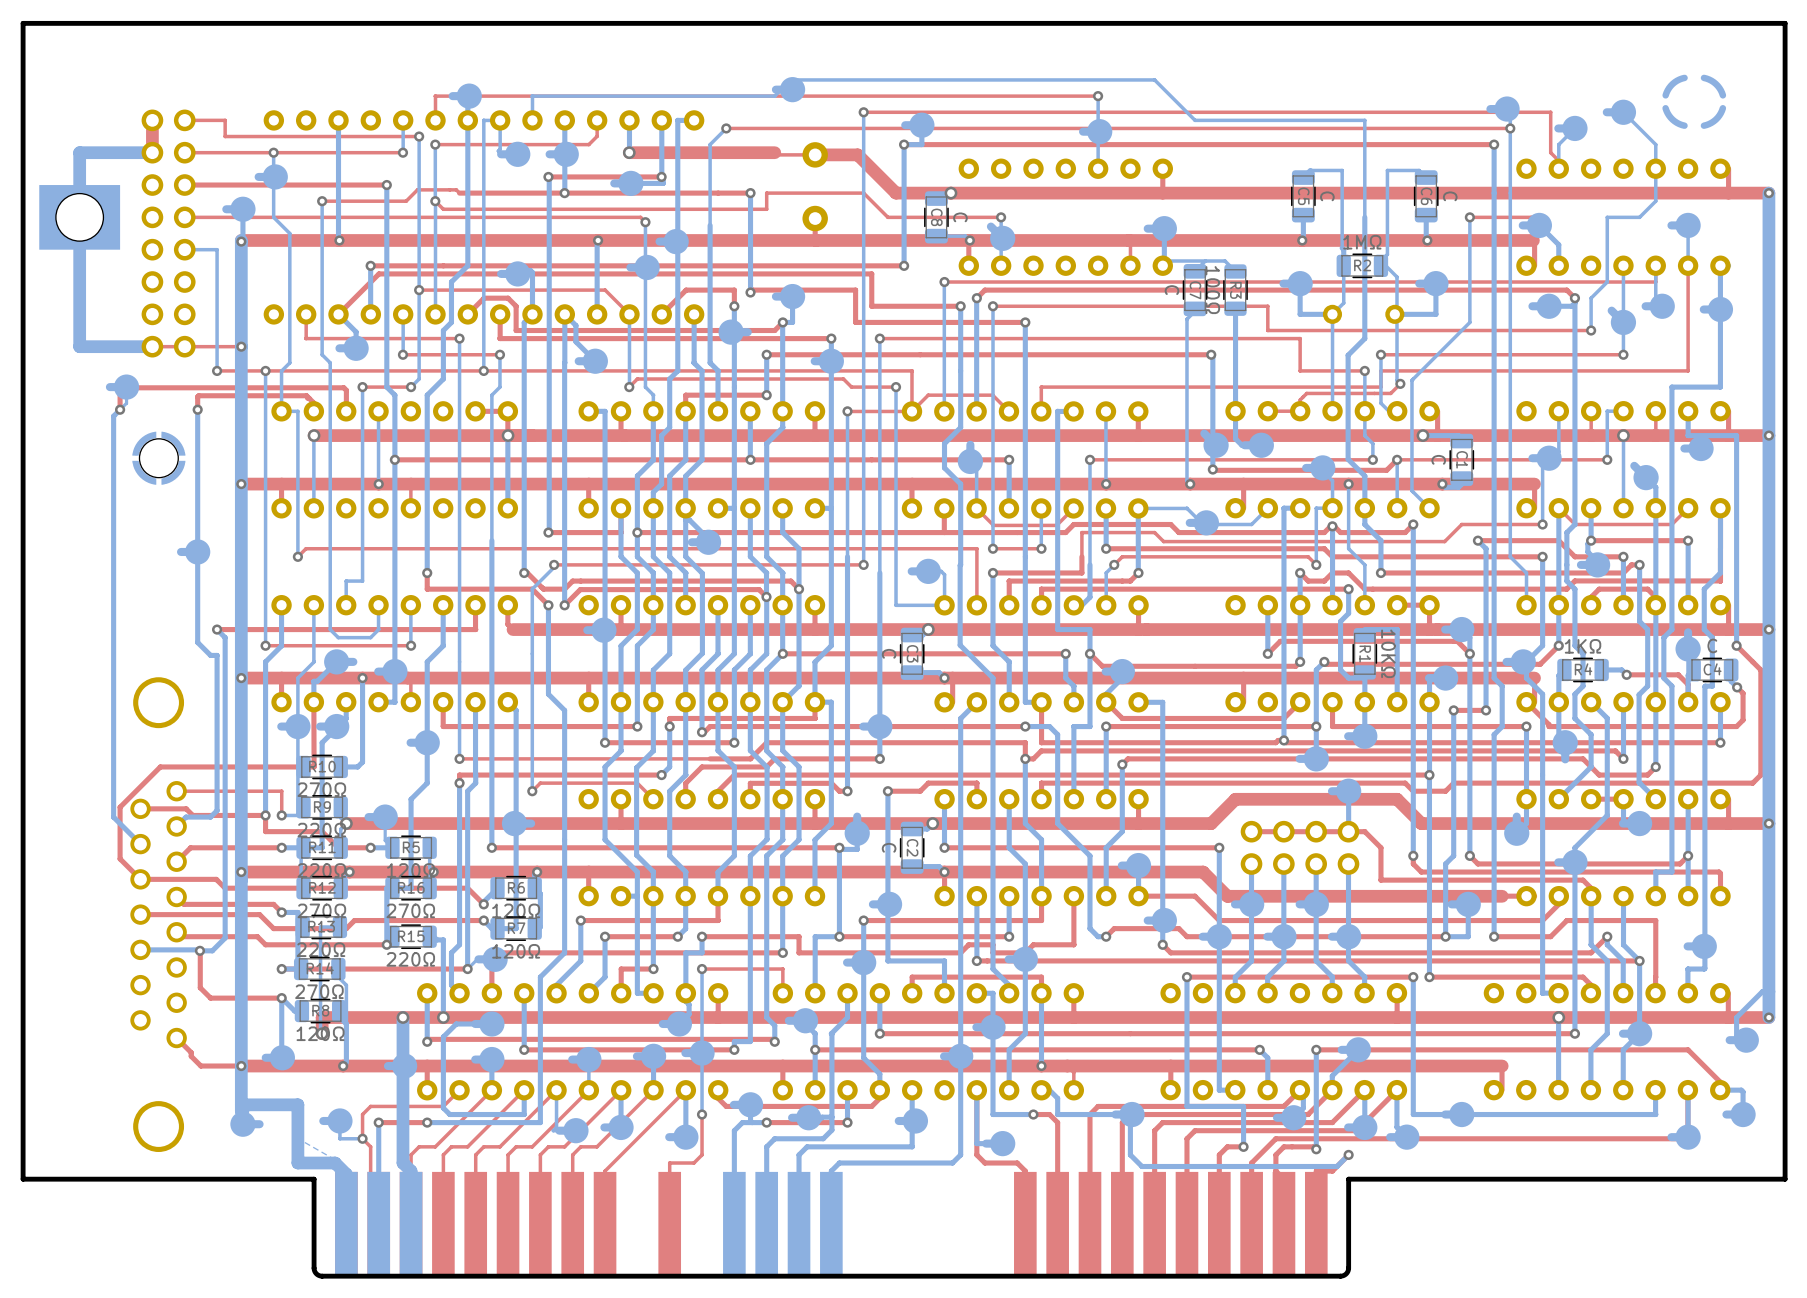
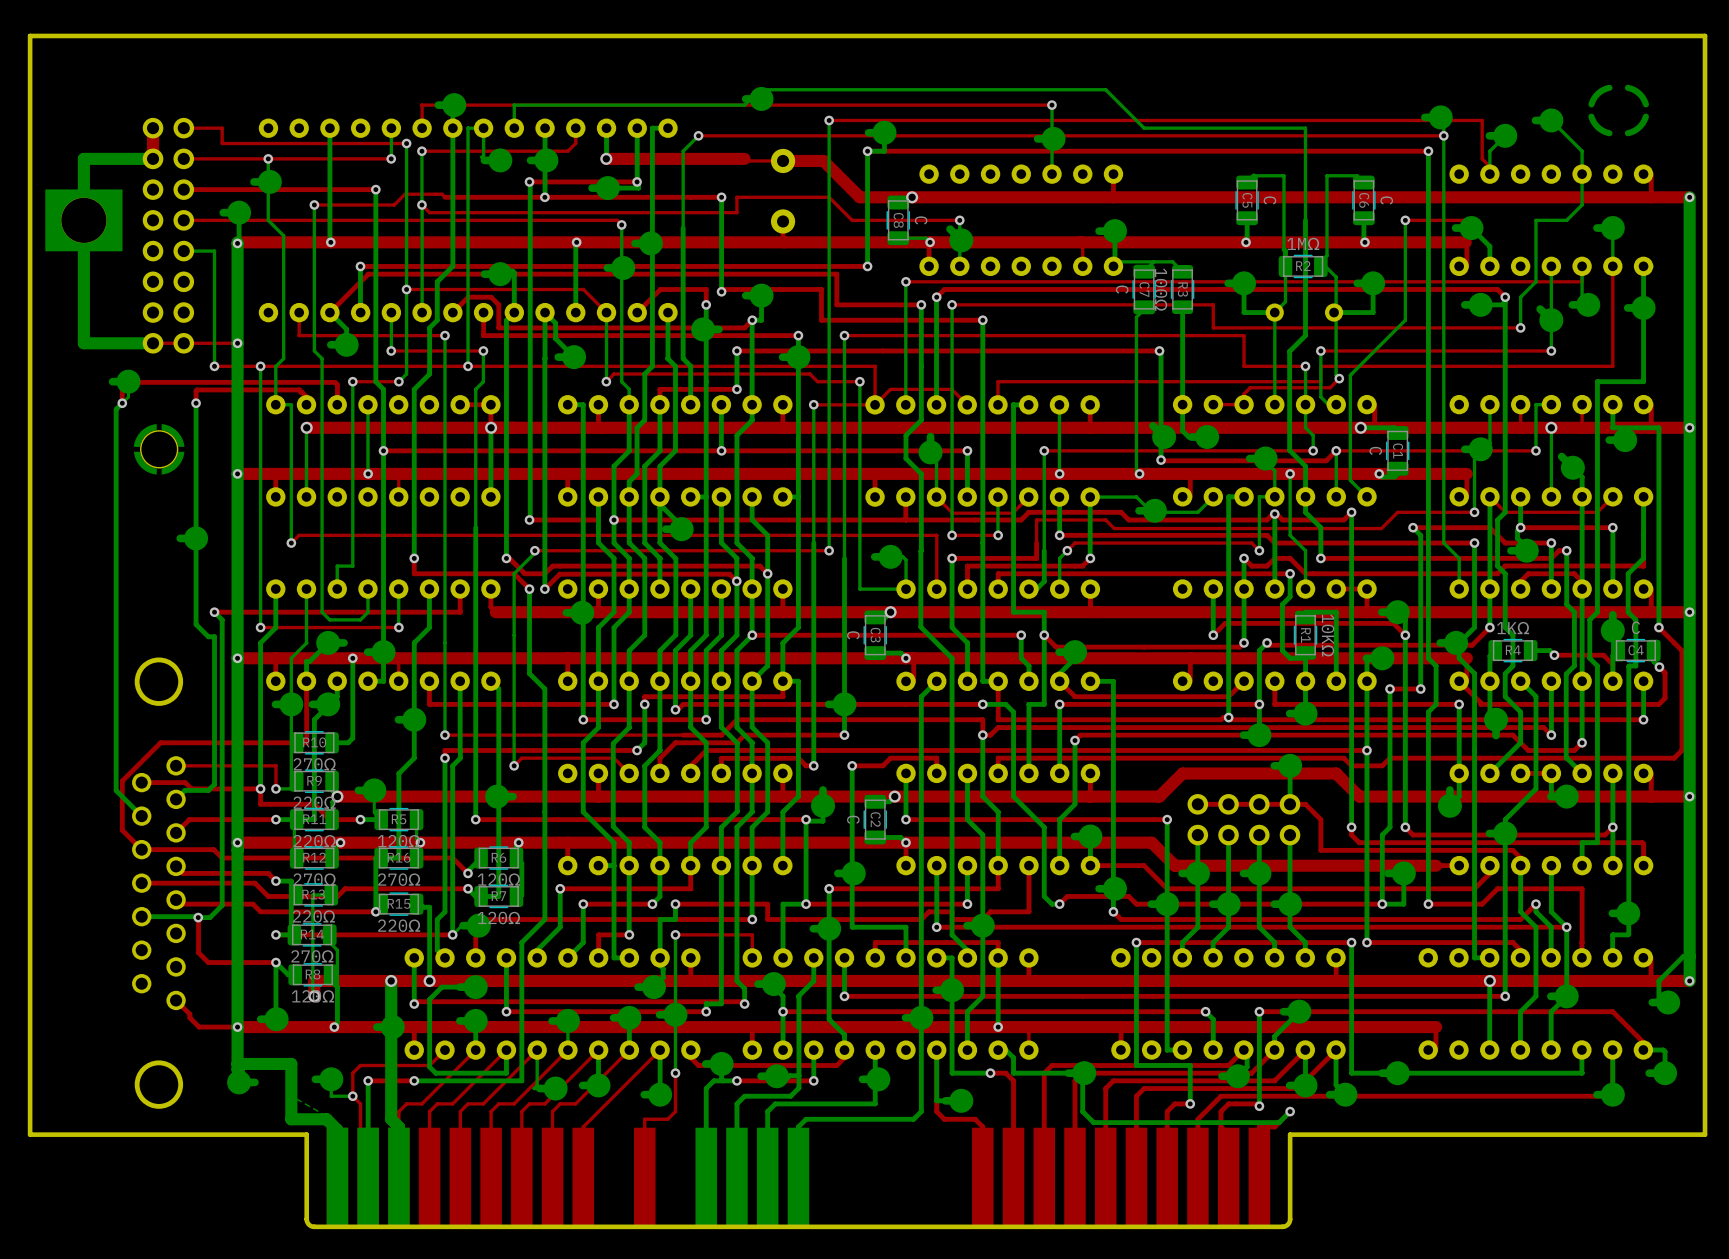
part footprint: [39, 185, 121, 250] -> [45, 189, 123, 252]

